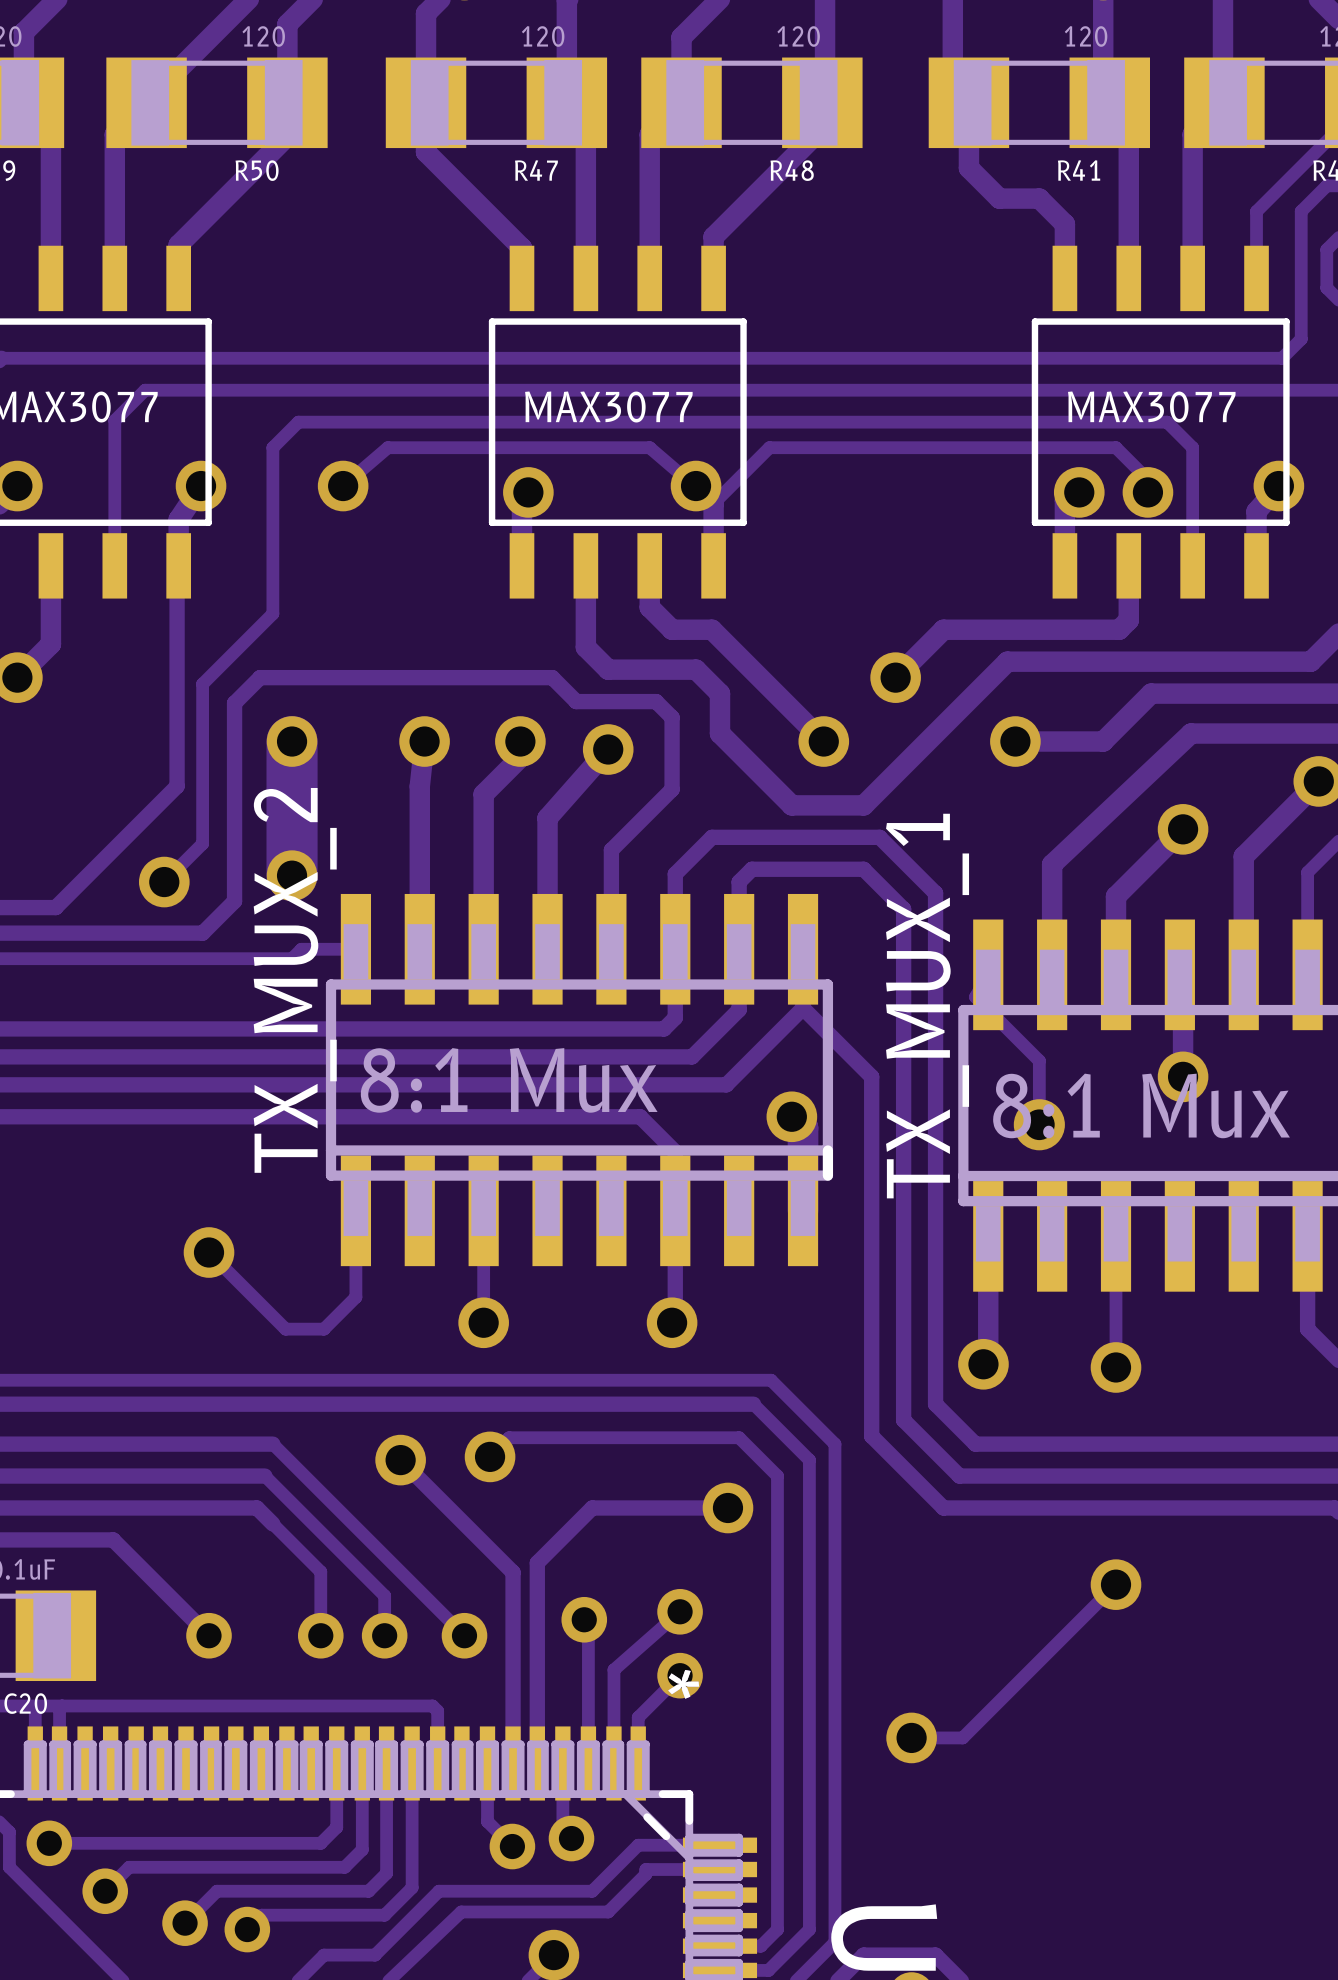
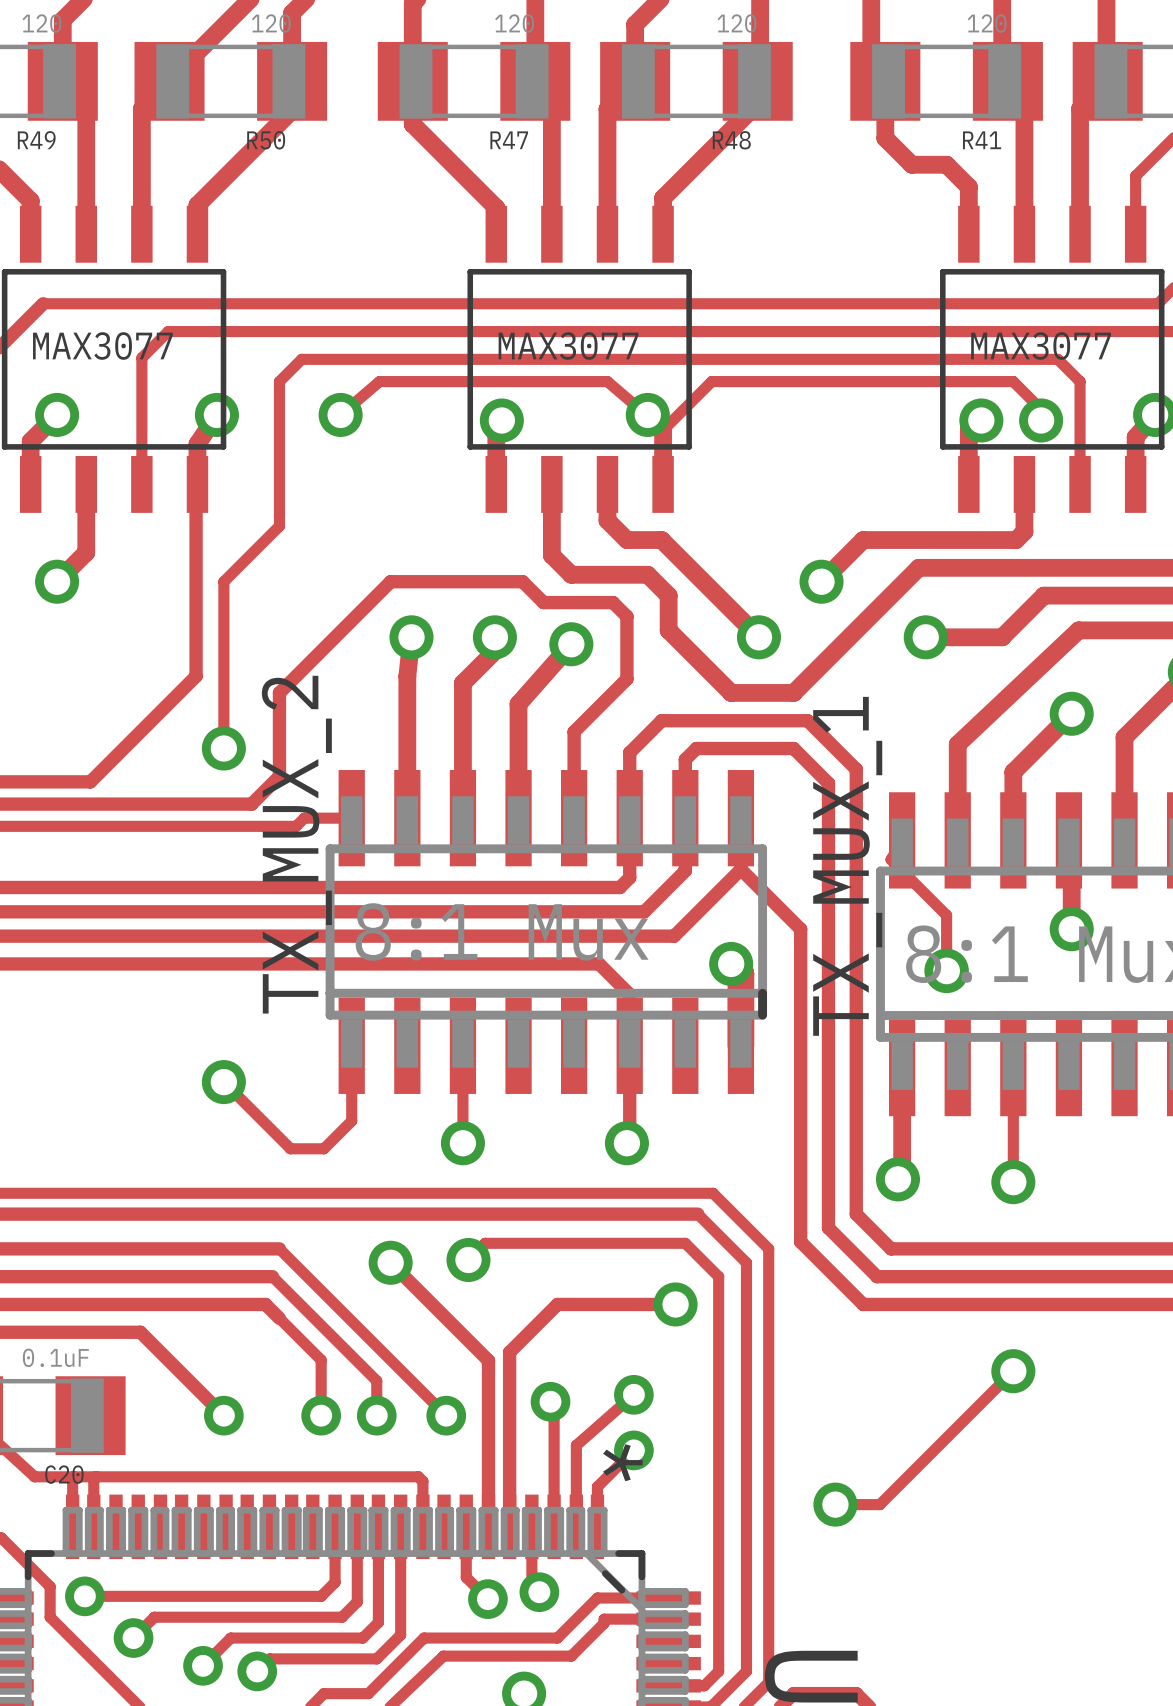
track: (209, 677) (202, 684) (202, 843) (164, 882) -> (223, 581) (223, 748)
track: (400, 677) (260, 677) (234, 703) (234, 901) (202, 933) -> (390, 581) (279, 692) (279, 776) (251, 804) (218, 804)
track: (292, 741) (292, 875) -> none
via: (292, 741) -> none
via: (292, 875) -> none
via position: (164, 882) -> (223, 748)

